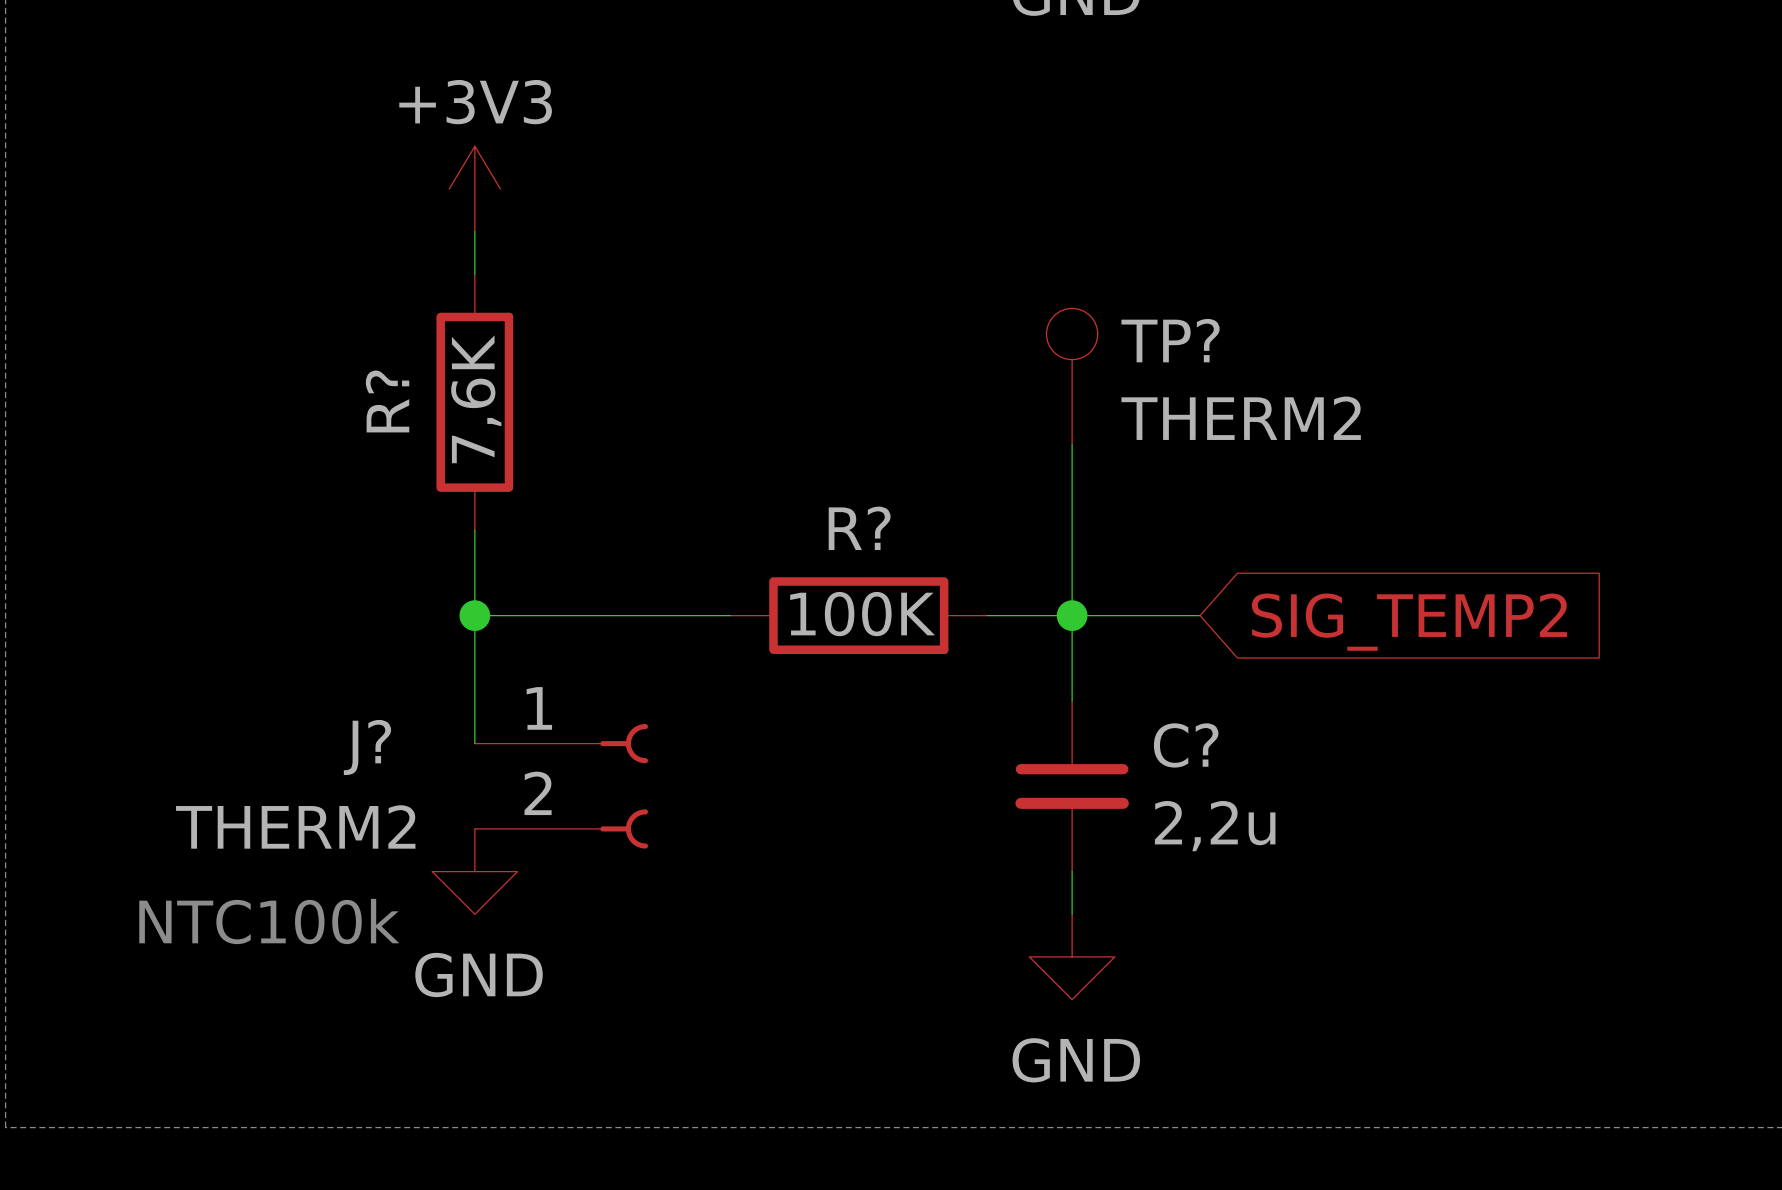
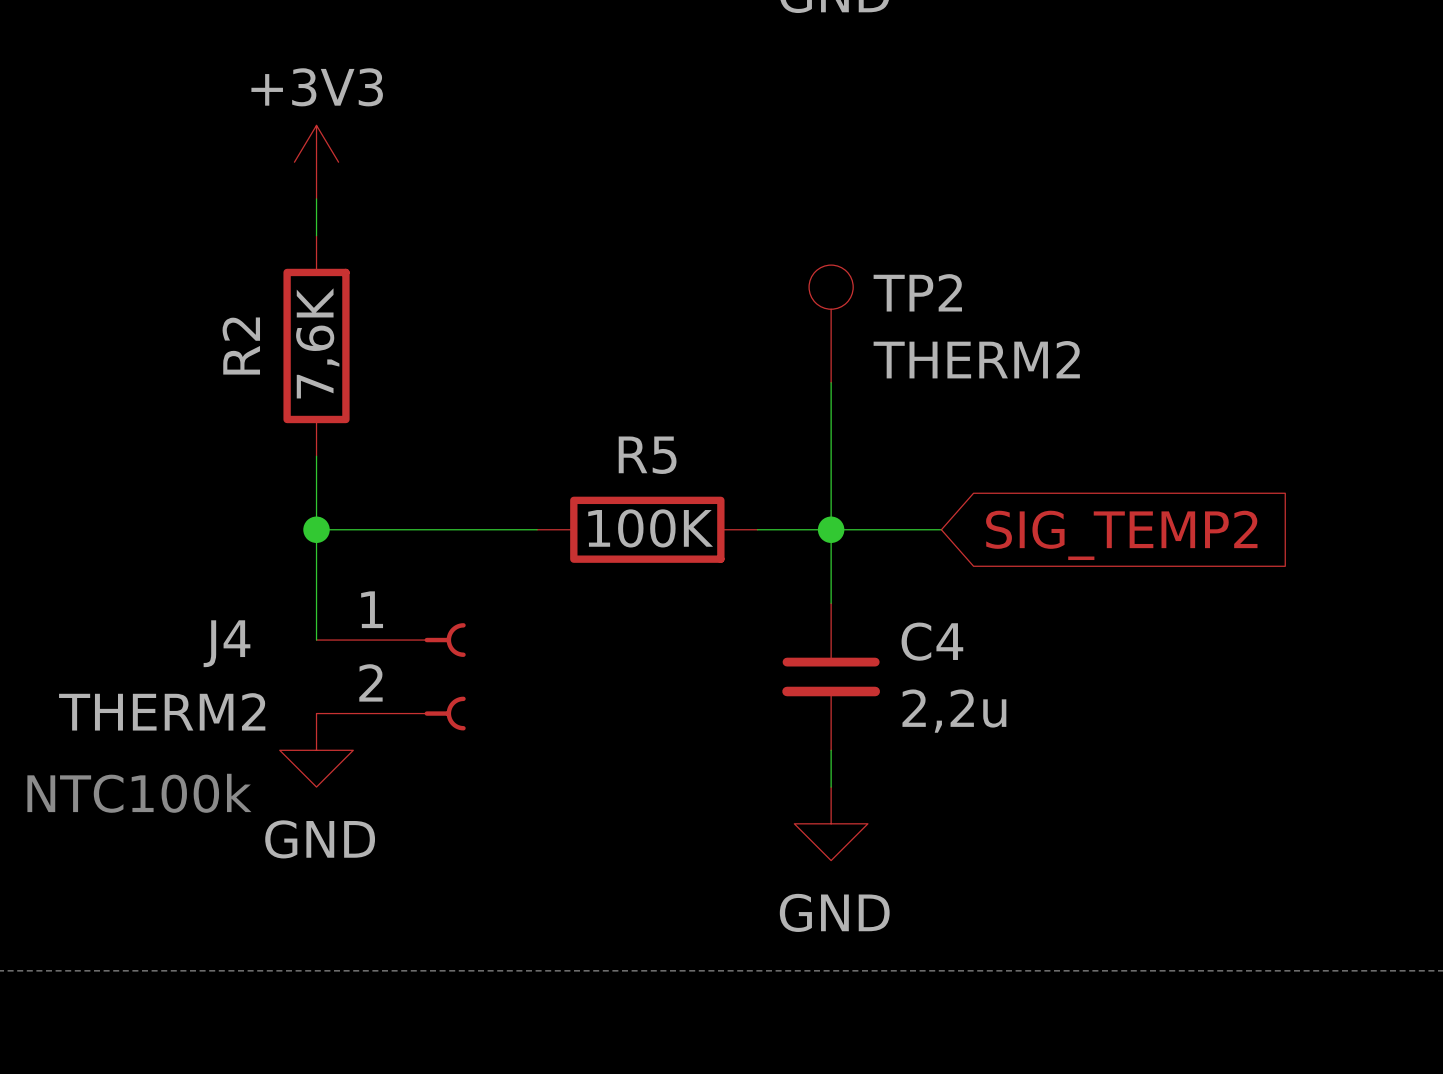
TP? name: TP? (1170, 340) -> TP2 (917, 292)
R? name: R? (387, 401) -> R2 (241, 346)
R? name: R? (859, 528) -> R5 (647, 455)
C? name: C? (1186, 745) -> C4 (932, 641)
J? name: J? (367, 747) -> J4 (227, 643)

